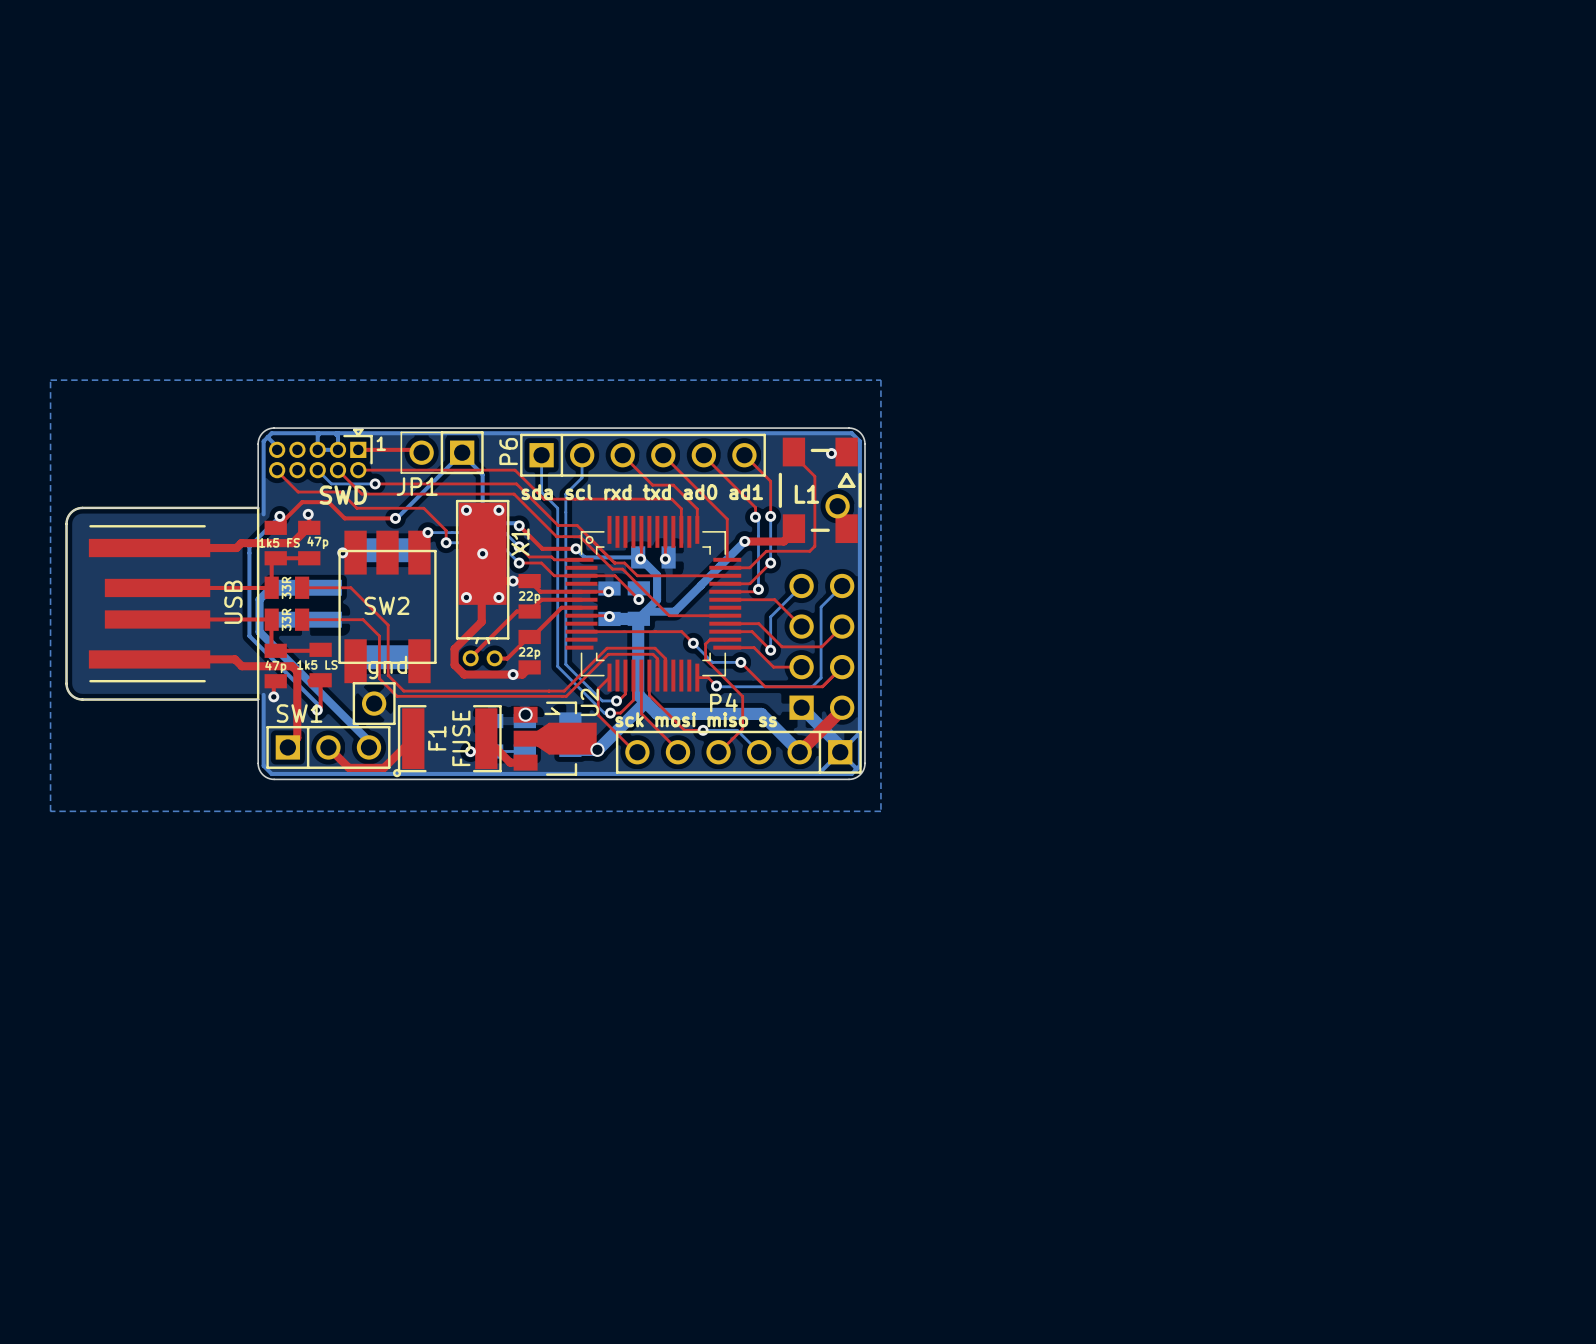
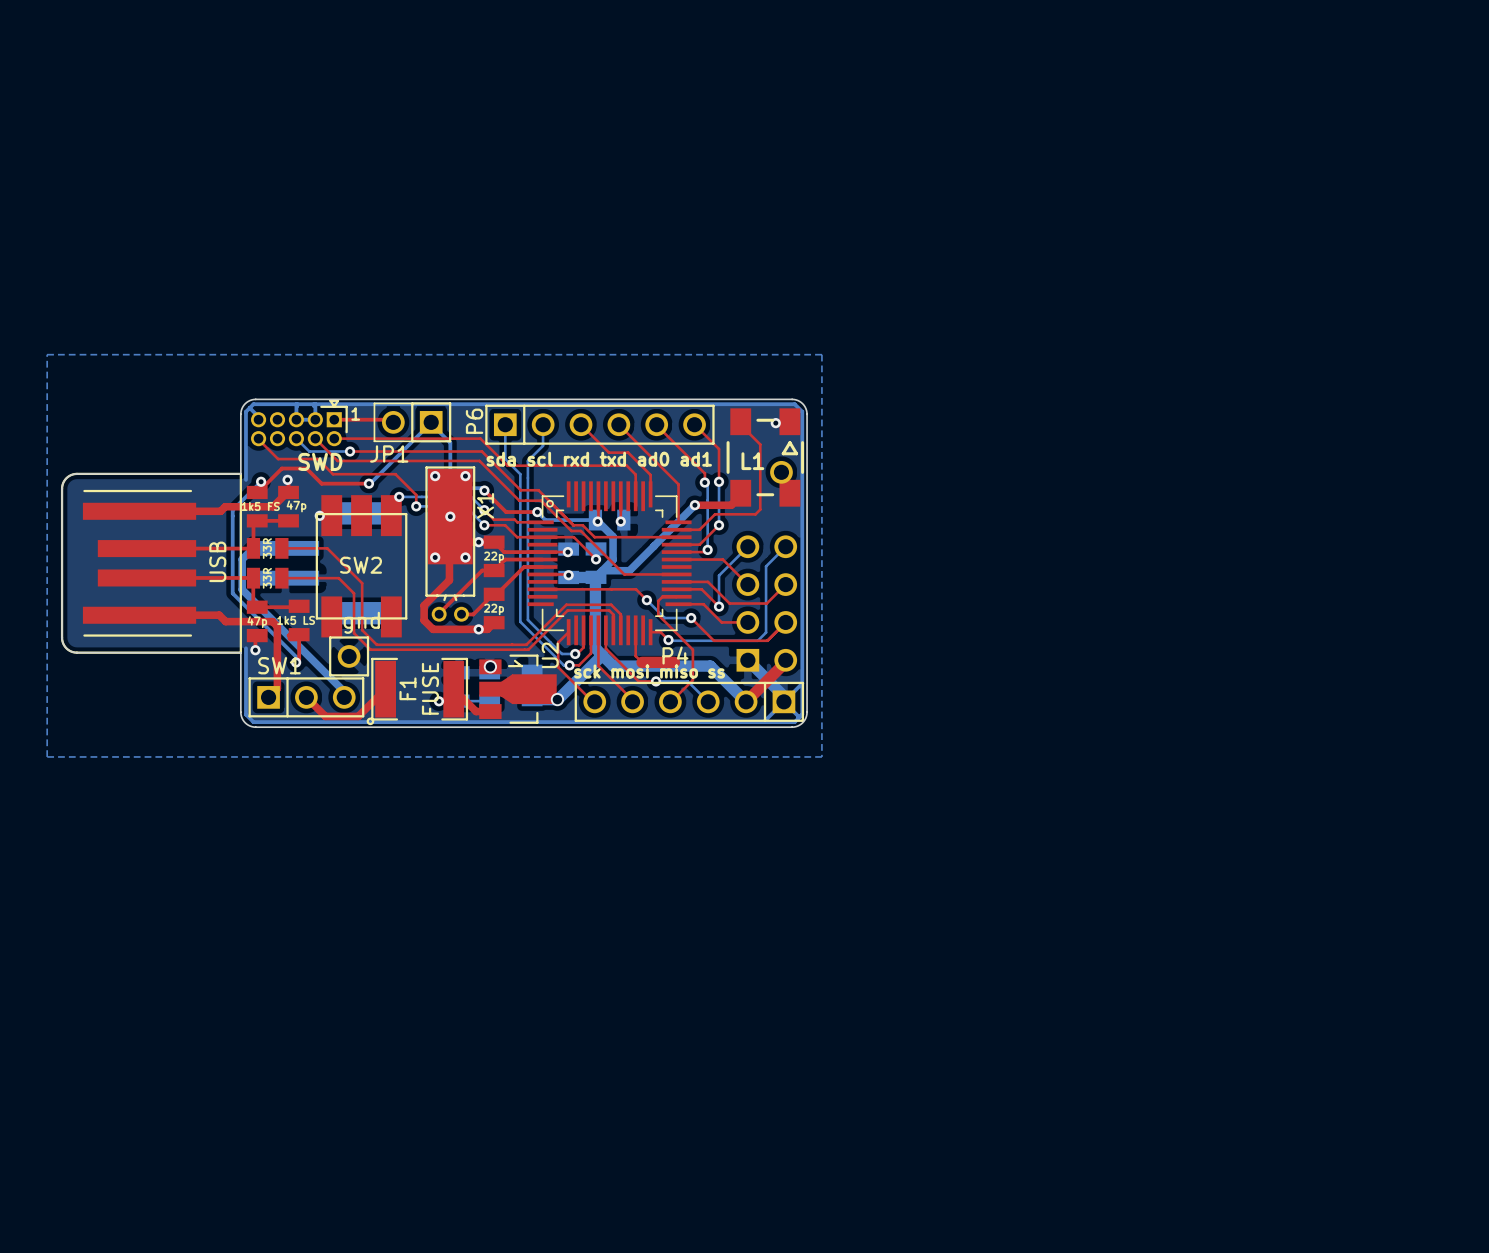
top track: none -> (635, 630) (635, 656) (642, 662) (674, 662)

